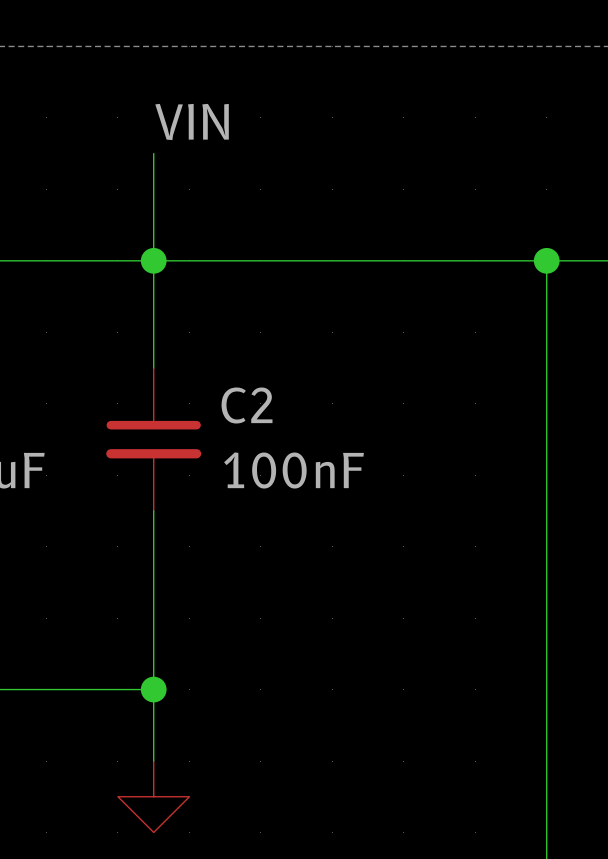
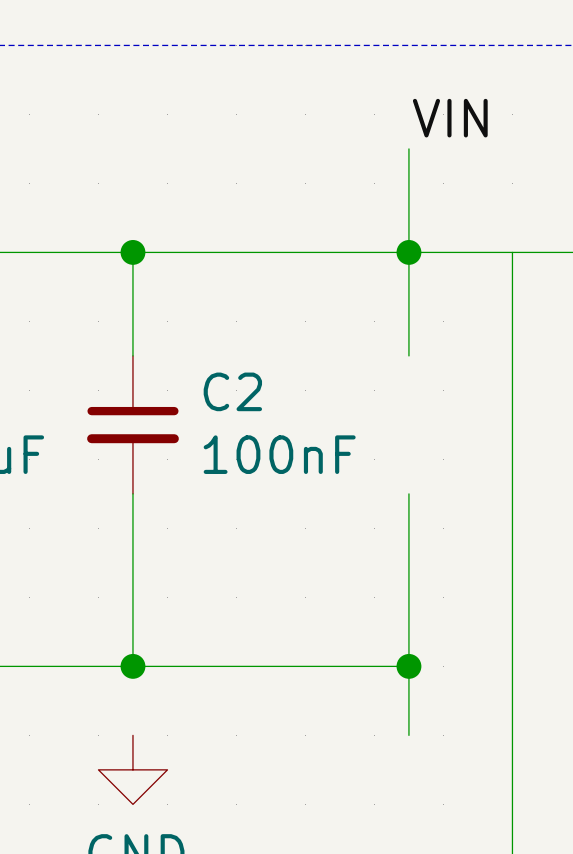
label position: VIN (192, 122) -> VIN (450, 118)
wire: (153, 153) (153, 260) -> none
wire: none -> (408, 148) (408, 355)
junction position: (546, 260) -> (408, 252)
wire: none -> (408, 493) (408, 735)
wire: (153, 689) (153, 761) -> (132, 666) (408, 666)
junction: none -> (408, 666)

